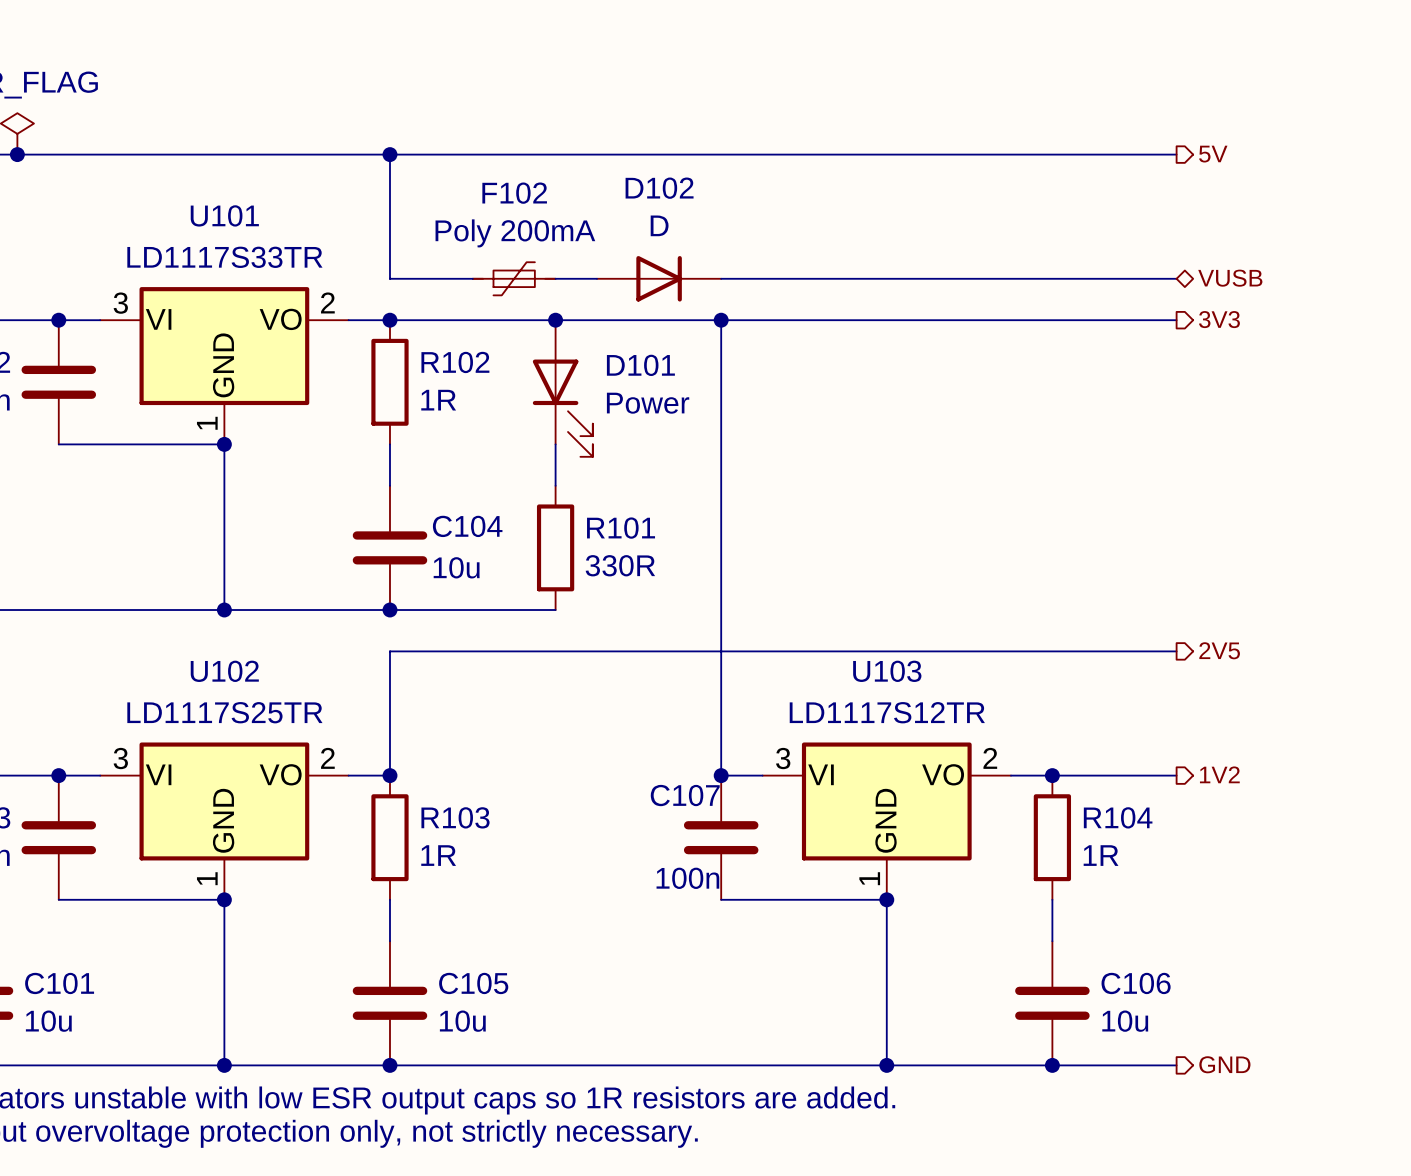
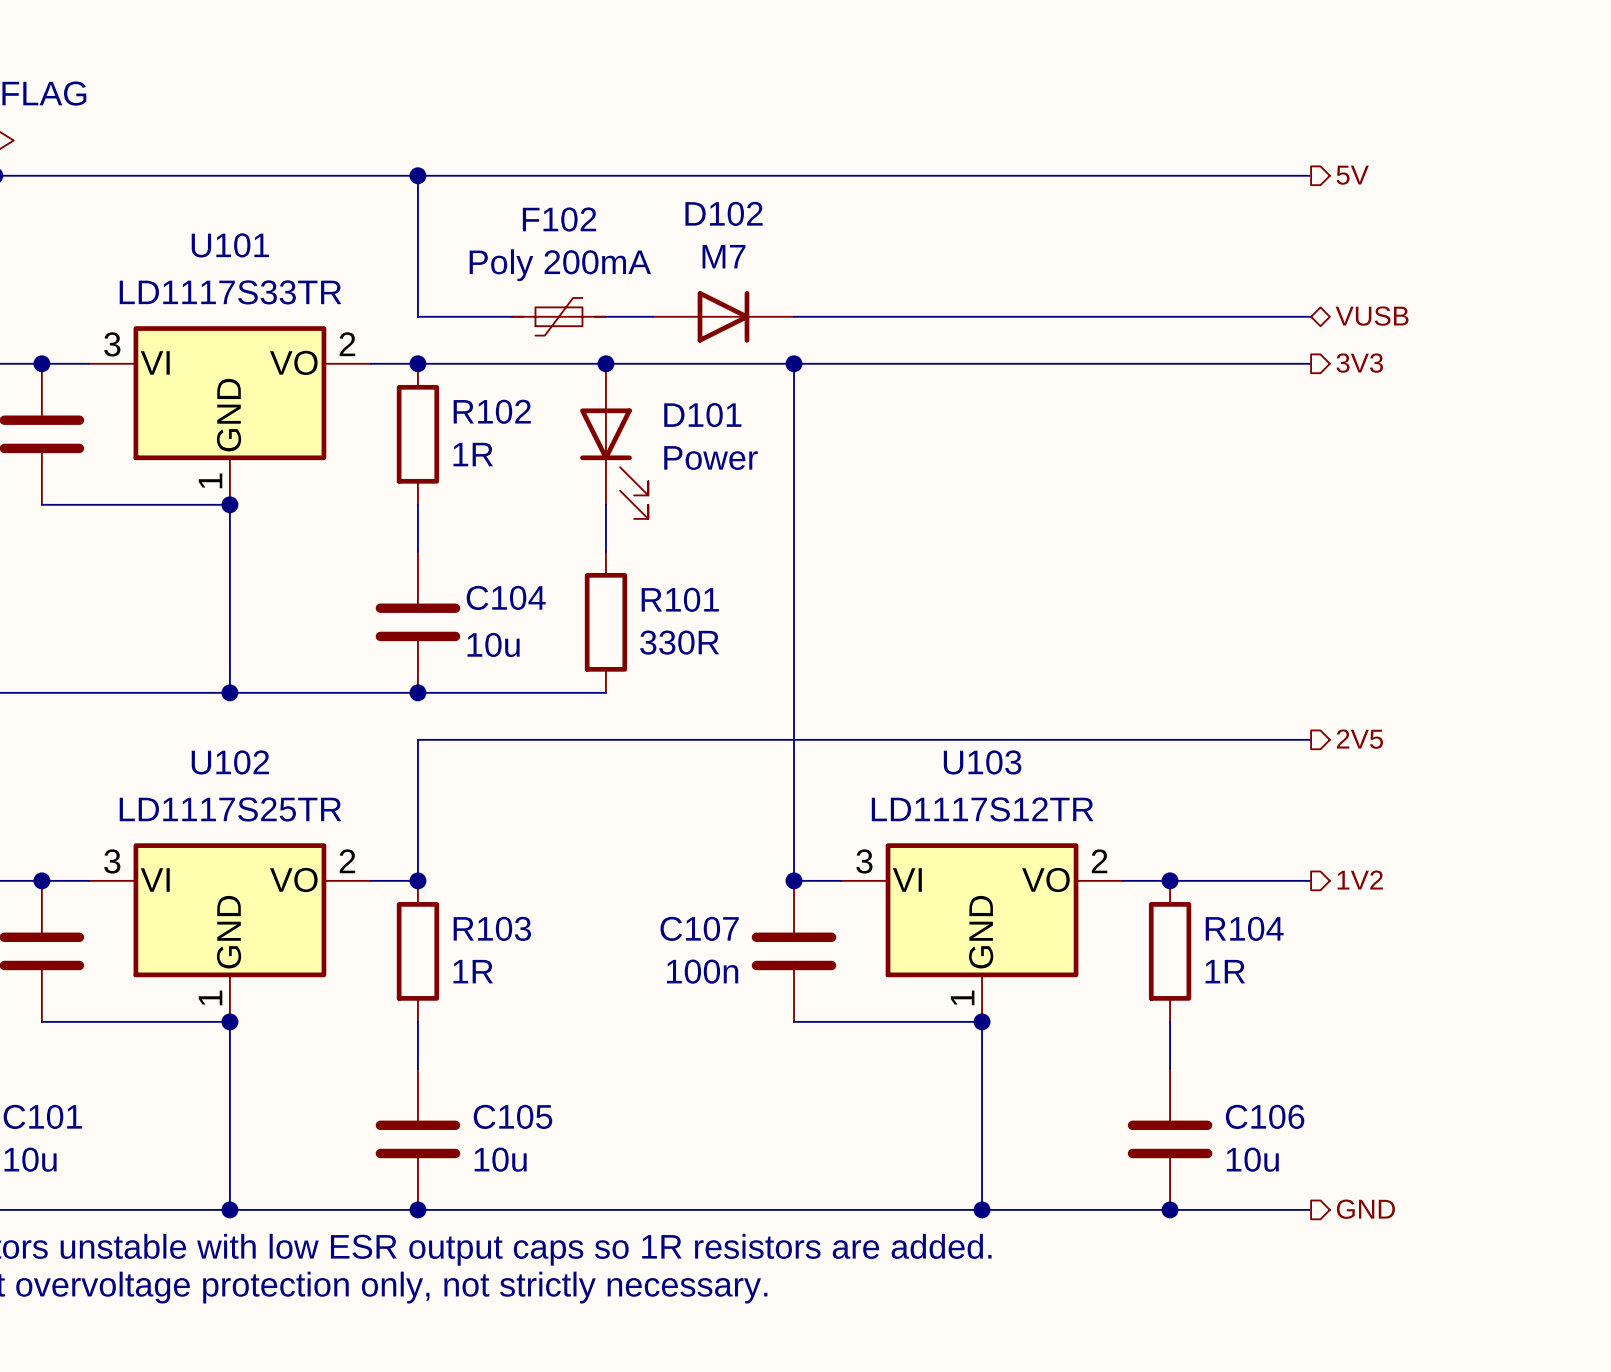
D102 value: D (659, 225) -> M7 (724, 256)
C107 name position: C107 (685, 795) -> C107 (699, 928)
C107 value position: 100n (687, 878) -> 100n (702, 971)

